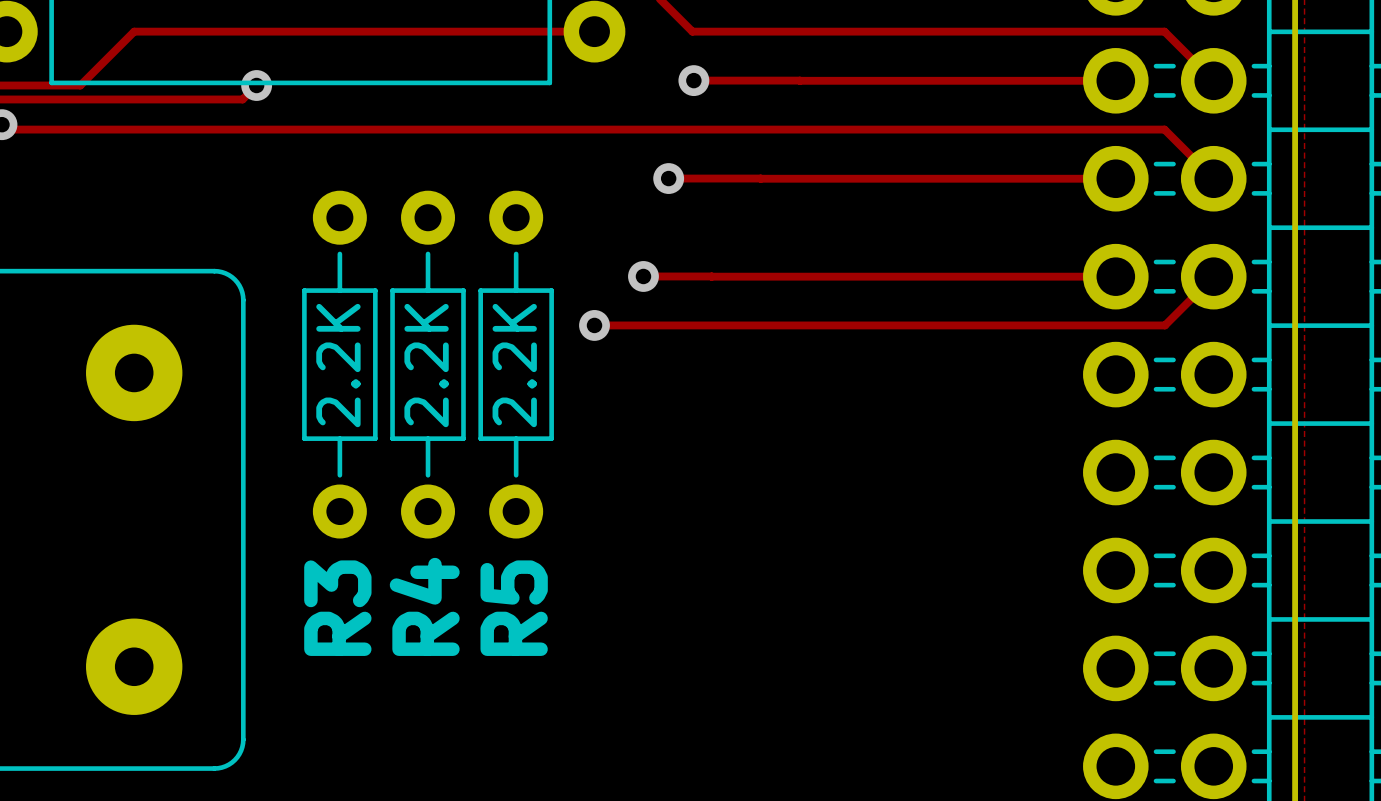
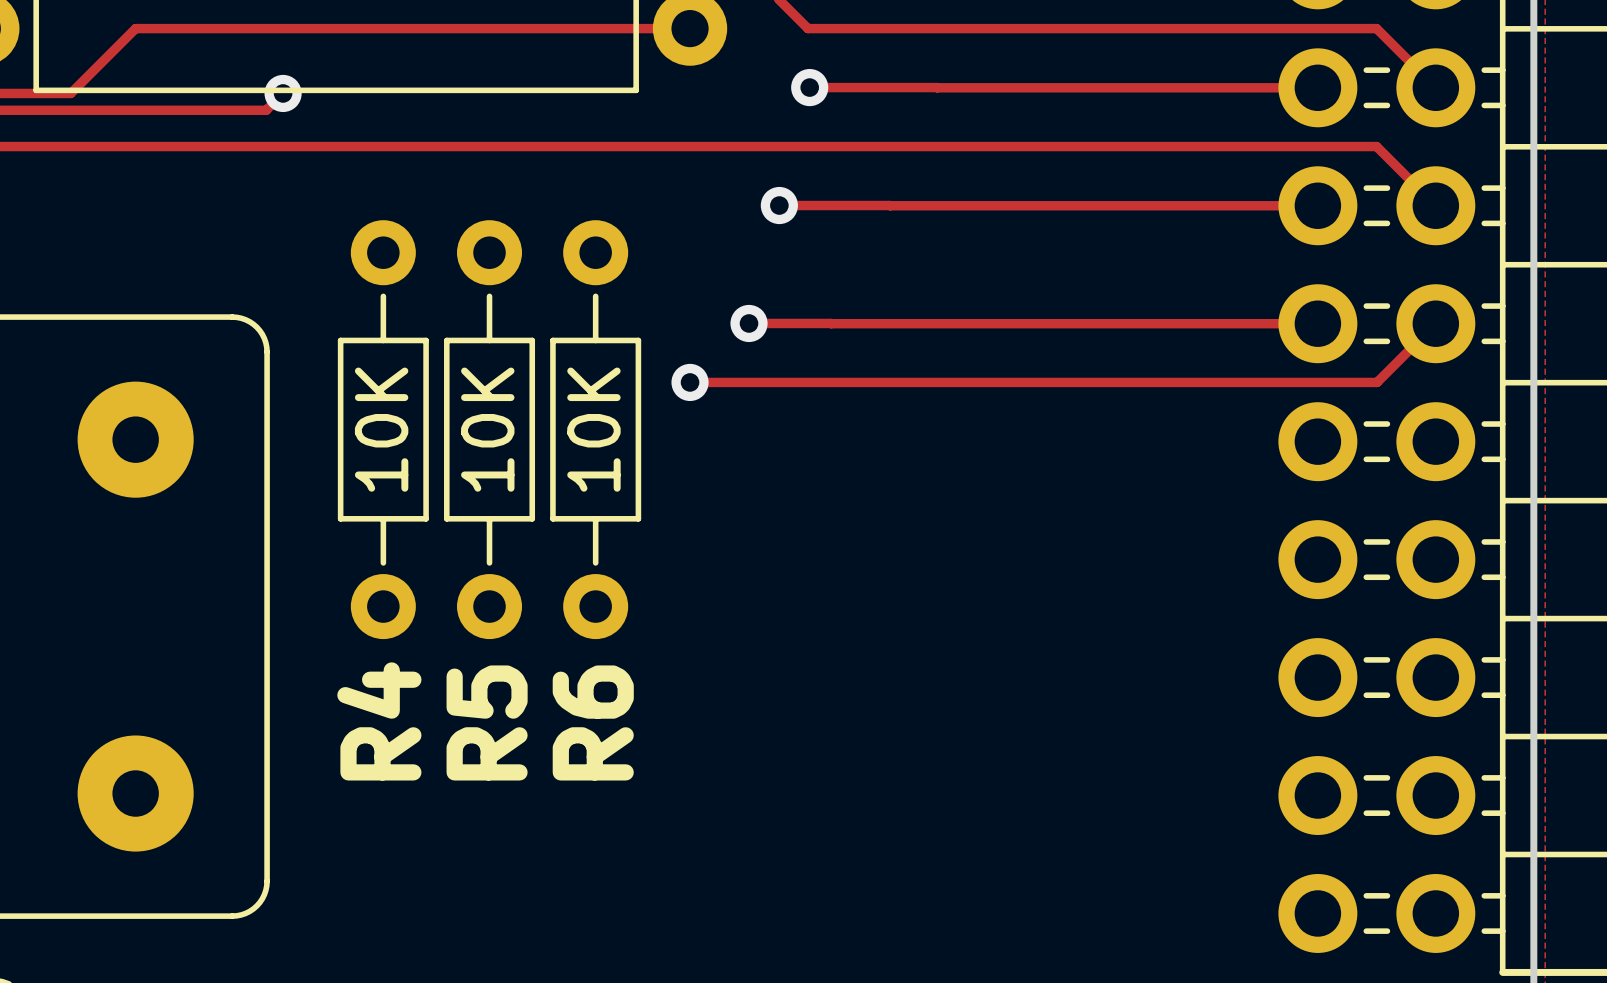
R3 value: 2.2K (338, 365) -> 10K (381, 429)
R4 value: 2.2K (426, 365) -> 10K (487, 429)
R5 value: 2.2K (514, 365) -> 10K (593, 429)
R4 name: R4 (424, 606) -> R5 (487, 722)
R3 name: R3 (337, 608) -> R4 (379, 721)
R5 name: R5 (514, 608) -> R6 (593, 722)

